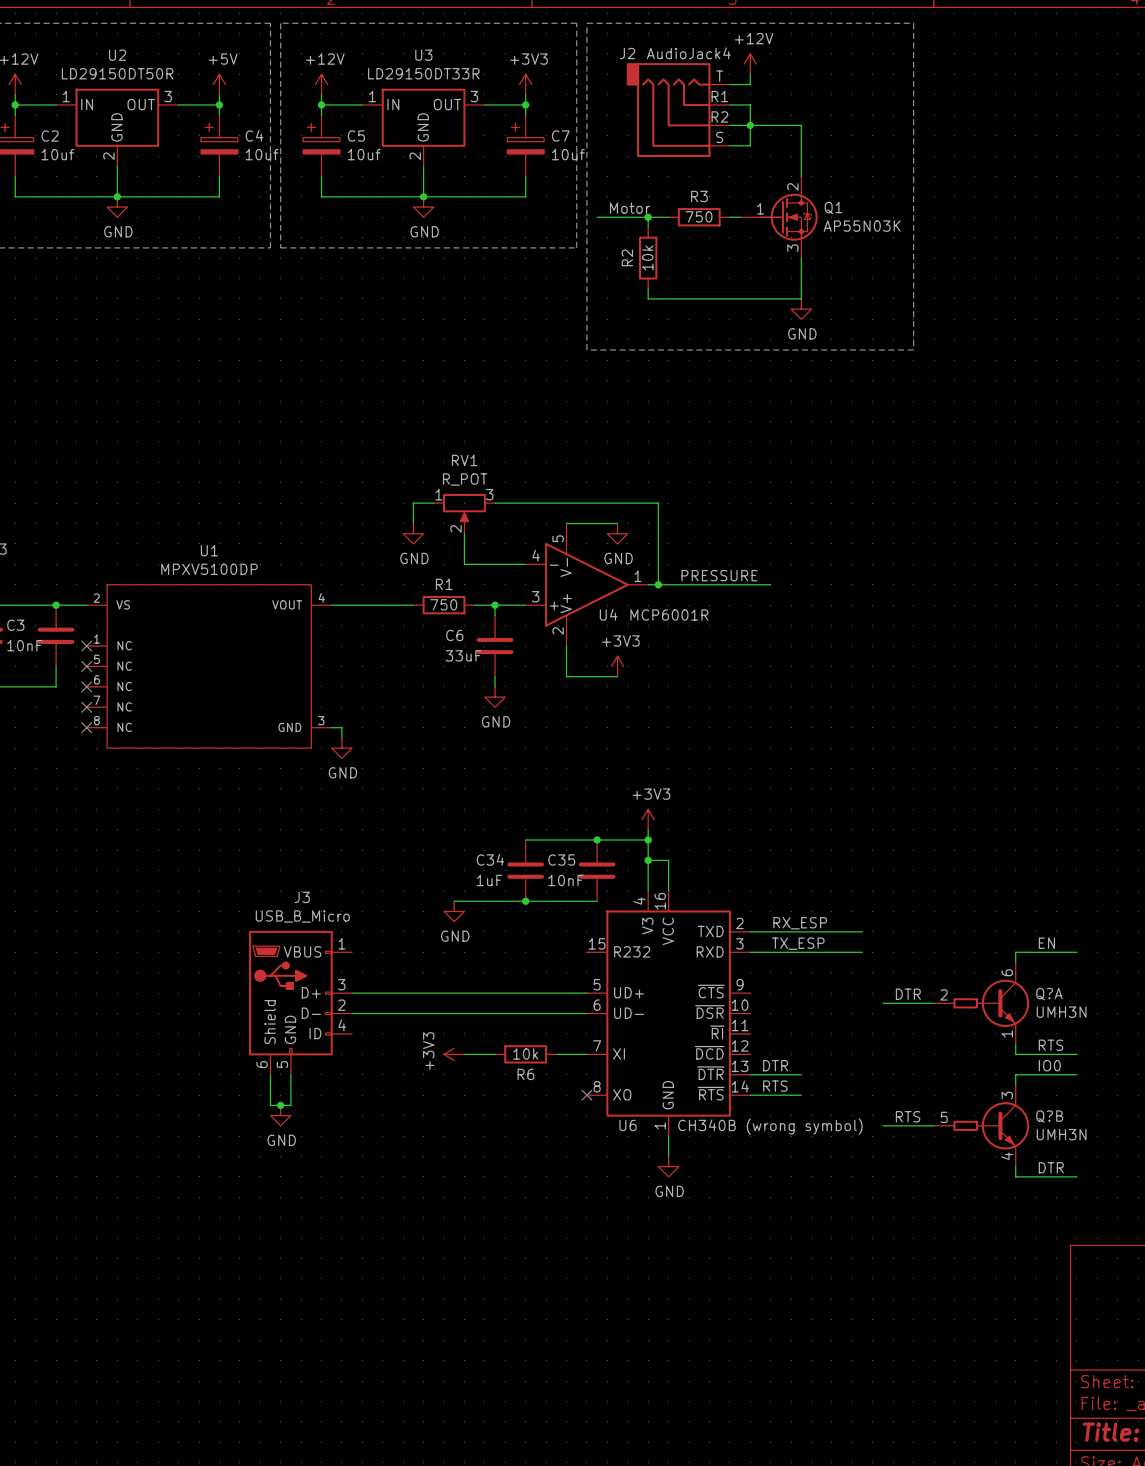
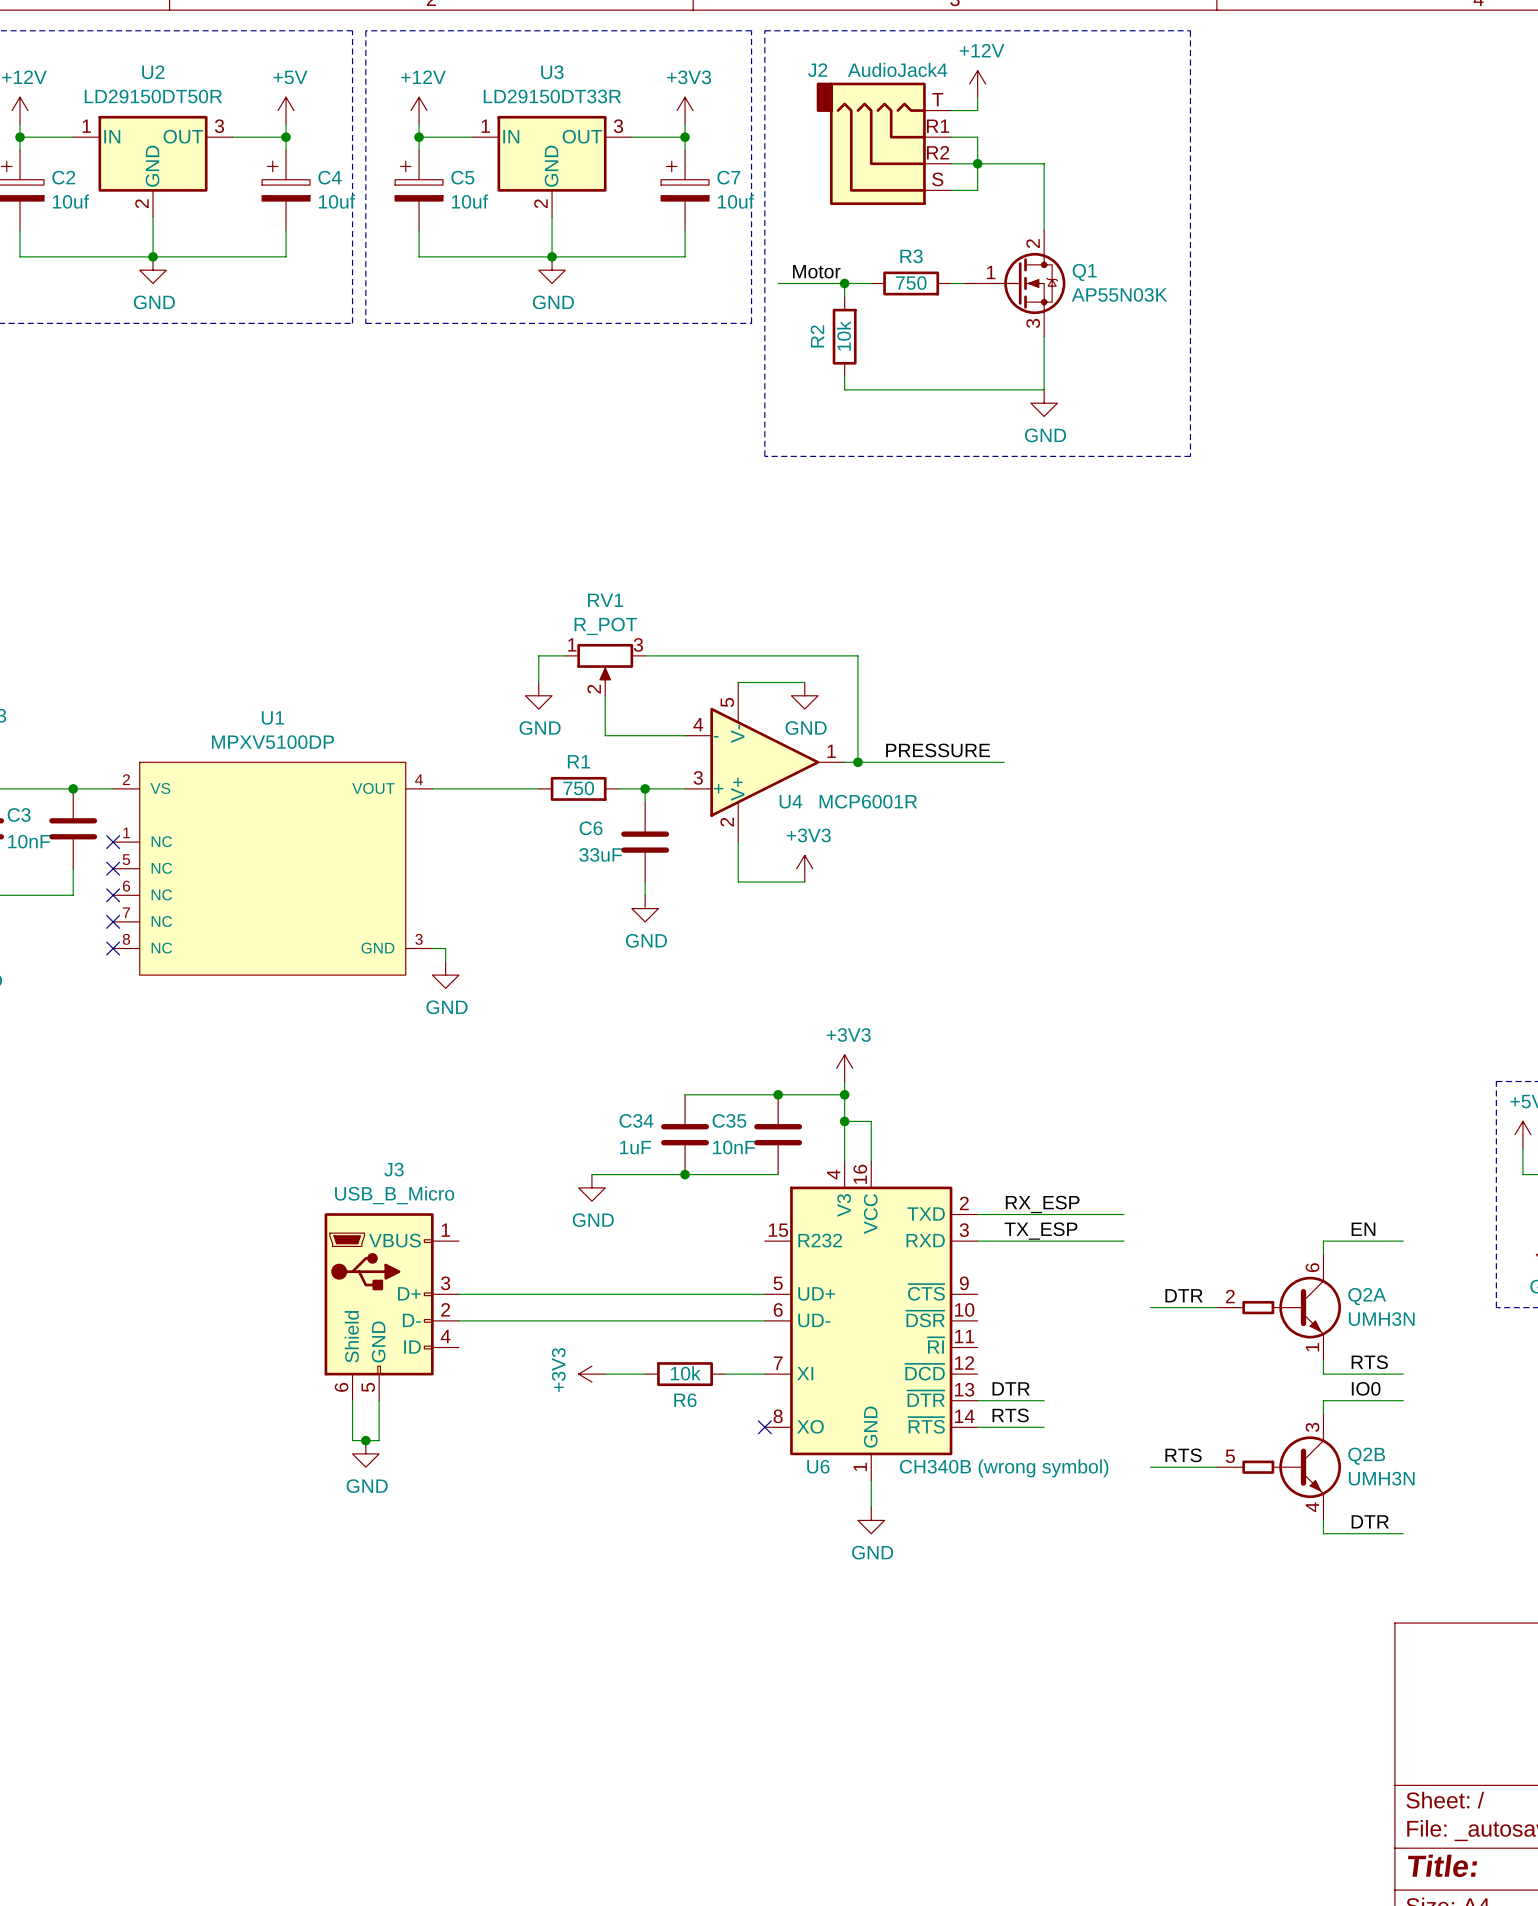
Q?A name: Q?A (1049, 994) -> Q2A (1367, 1296)
Q?B name: Q?B (1049, 1116) -> Q2B (1366, 1456)

